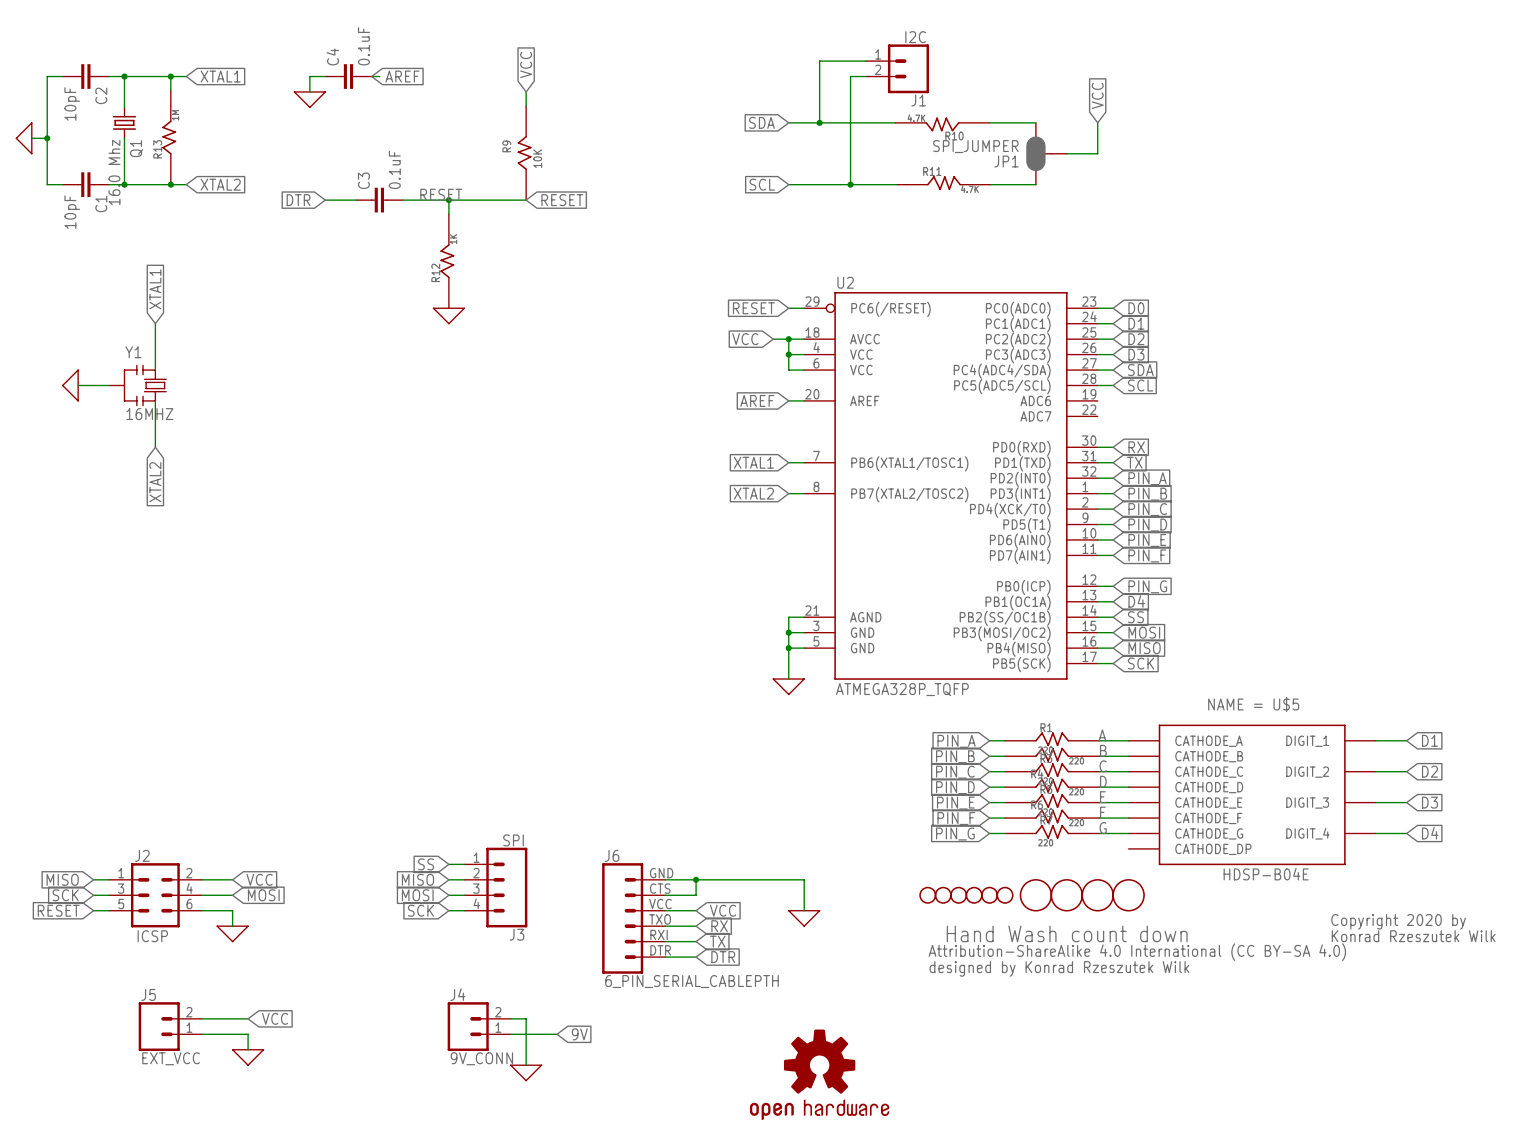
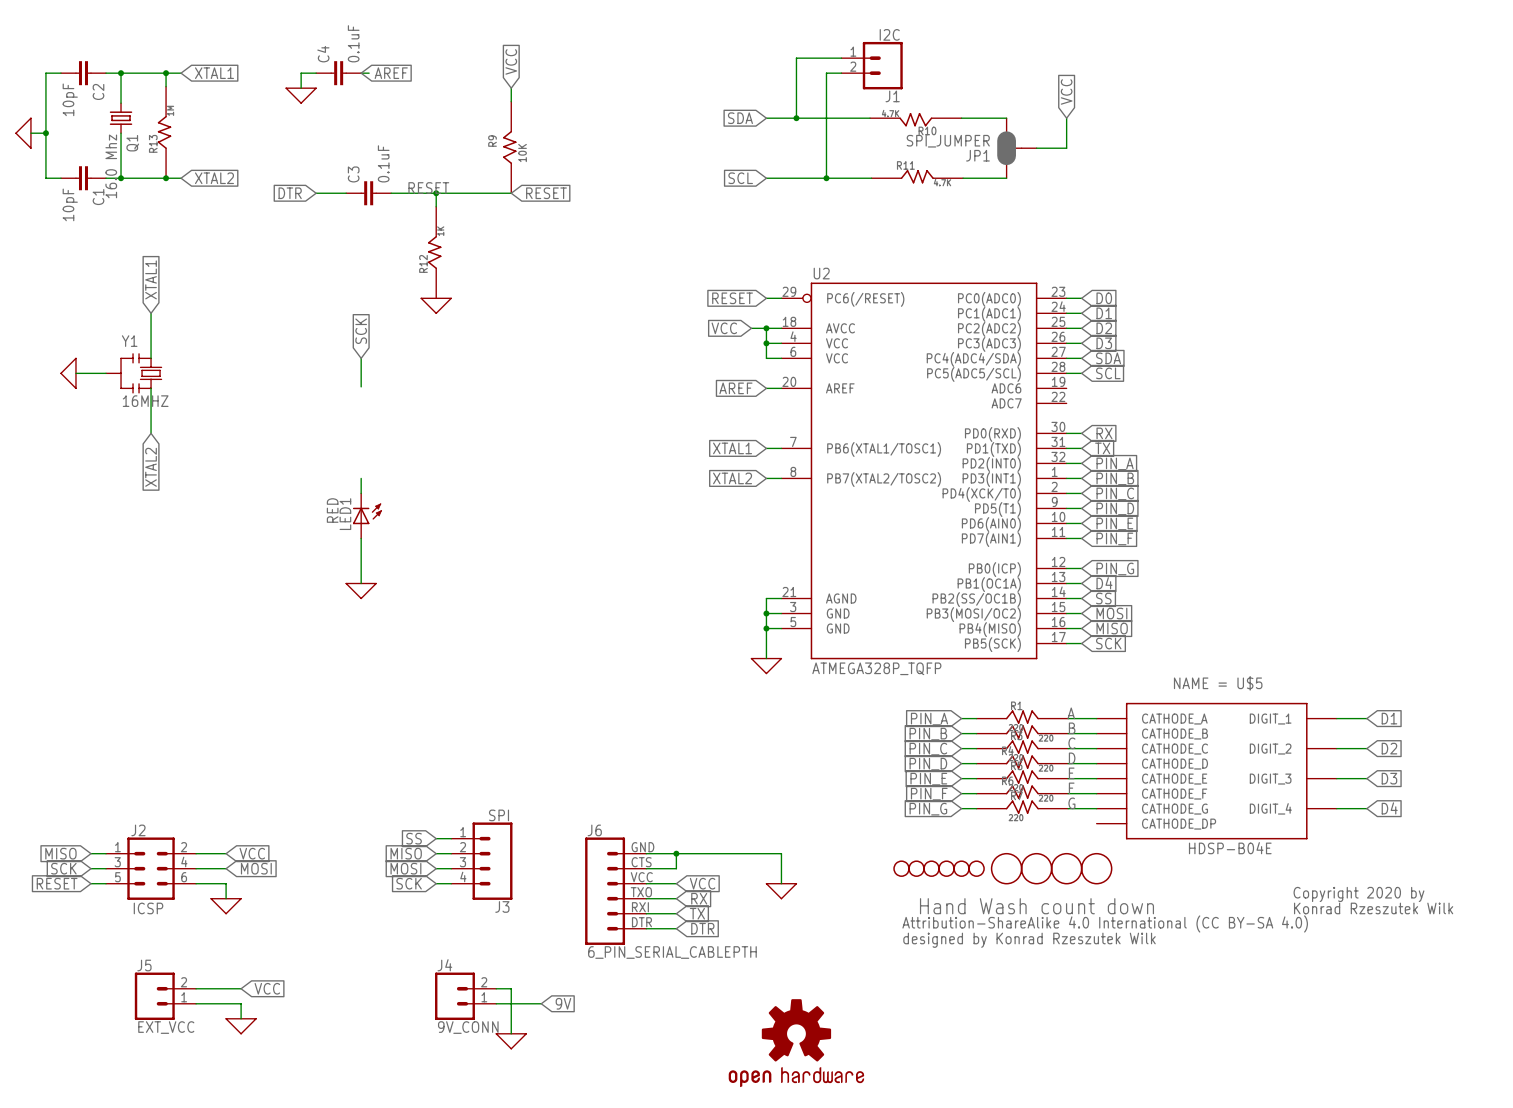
global label: none -> SCK (361, 331)
wire: none -> (361, 358) (361, 386)
wire: none -> (361, 478) (361, 493)
LED1: none -> RED (367, 515)
wire: none -> (361, 538) (361, 583)
power symbol: none -> (361, 591)

